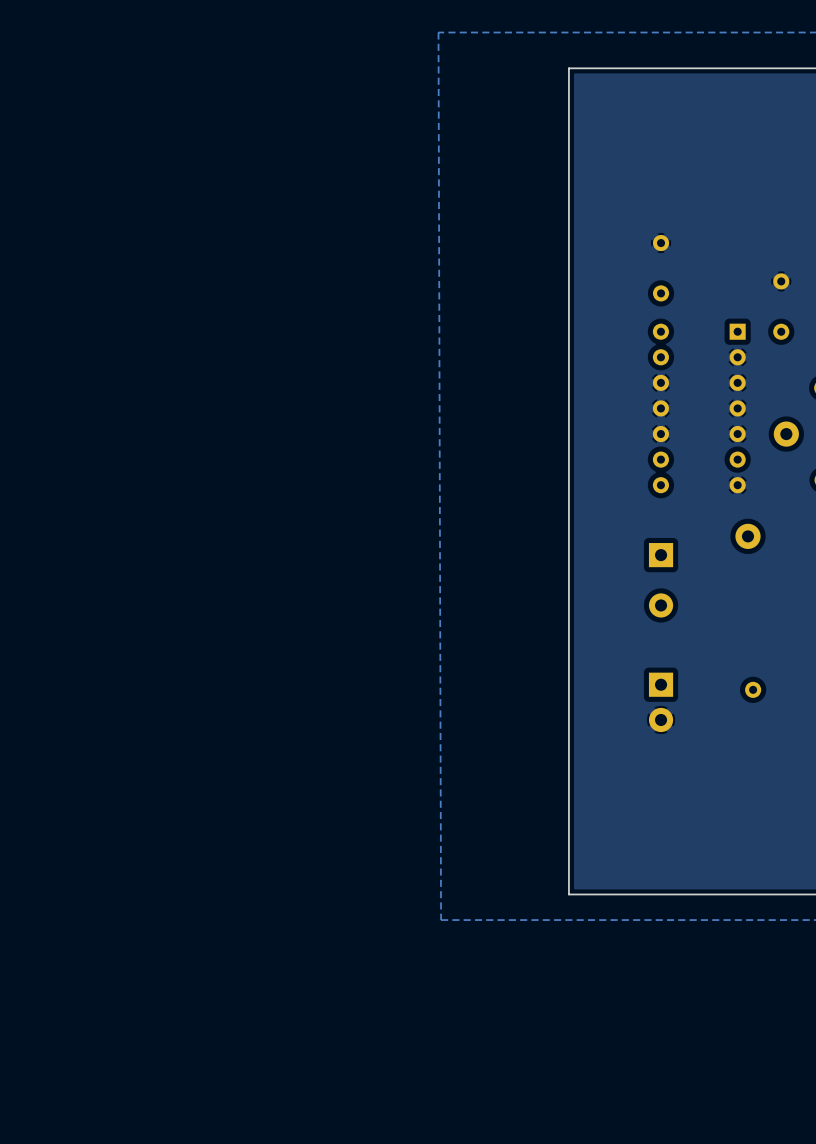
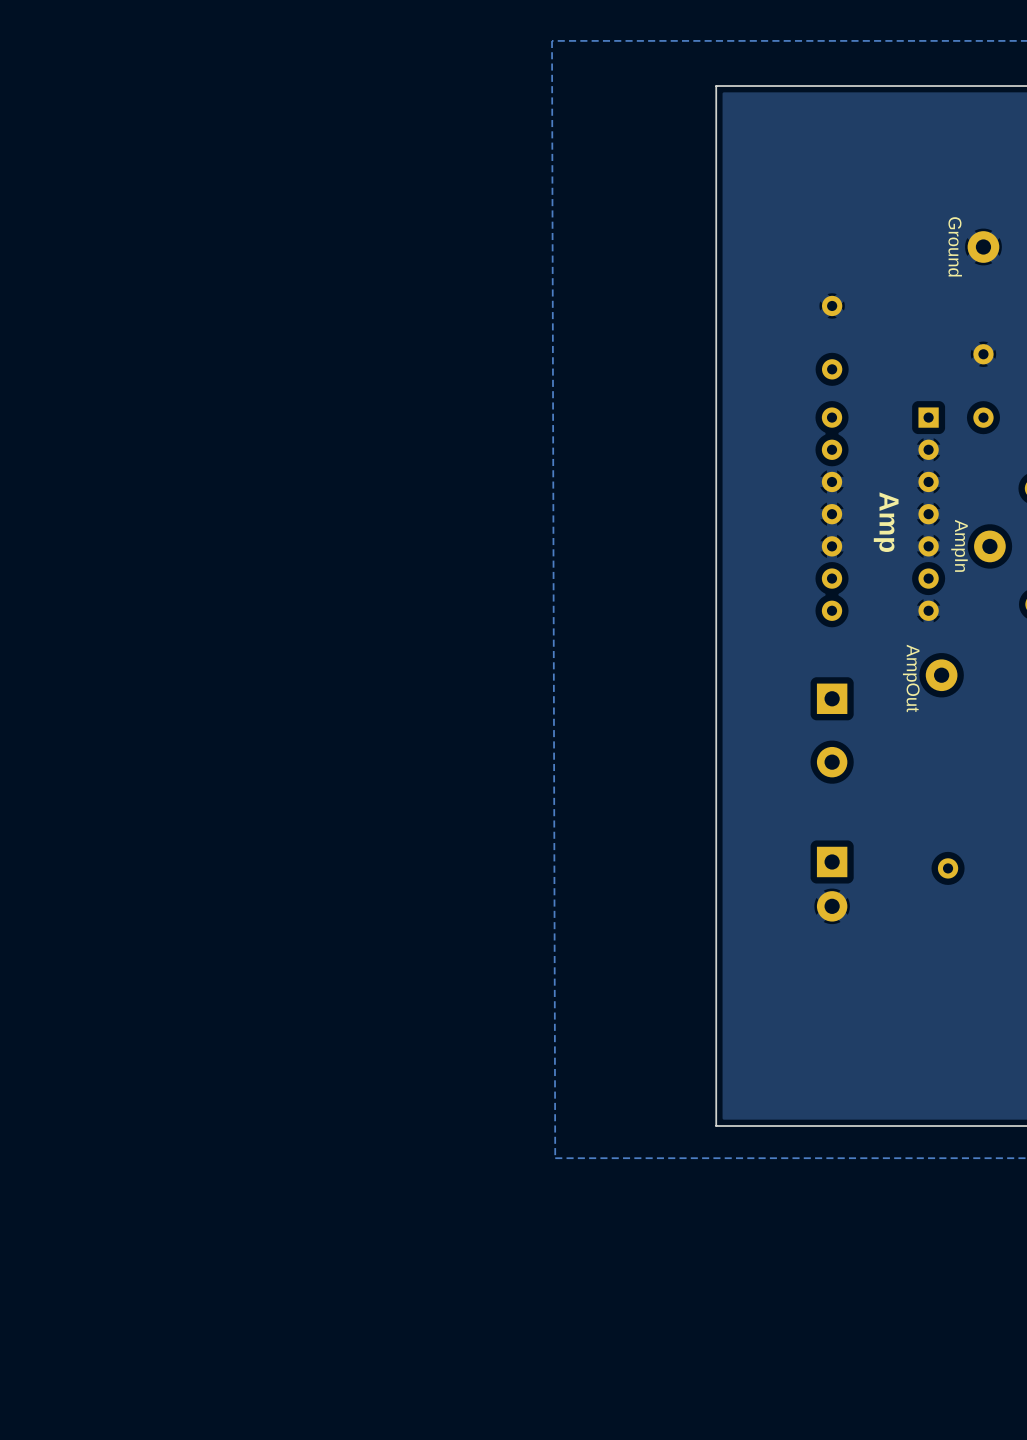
text: none -> Ground (955, 246)
part: none -> (983, 246)
text: none -> Amp (886, 522)
text: none -> AmpIn (959, 545)
text: none -> AmpOut (911, 678)

